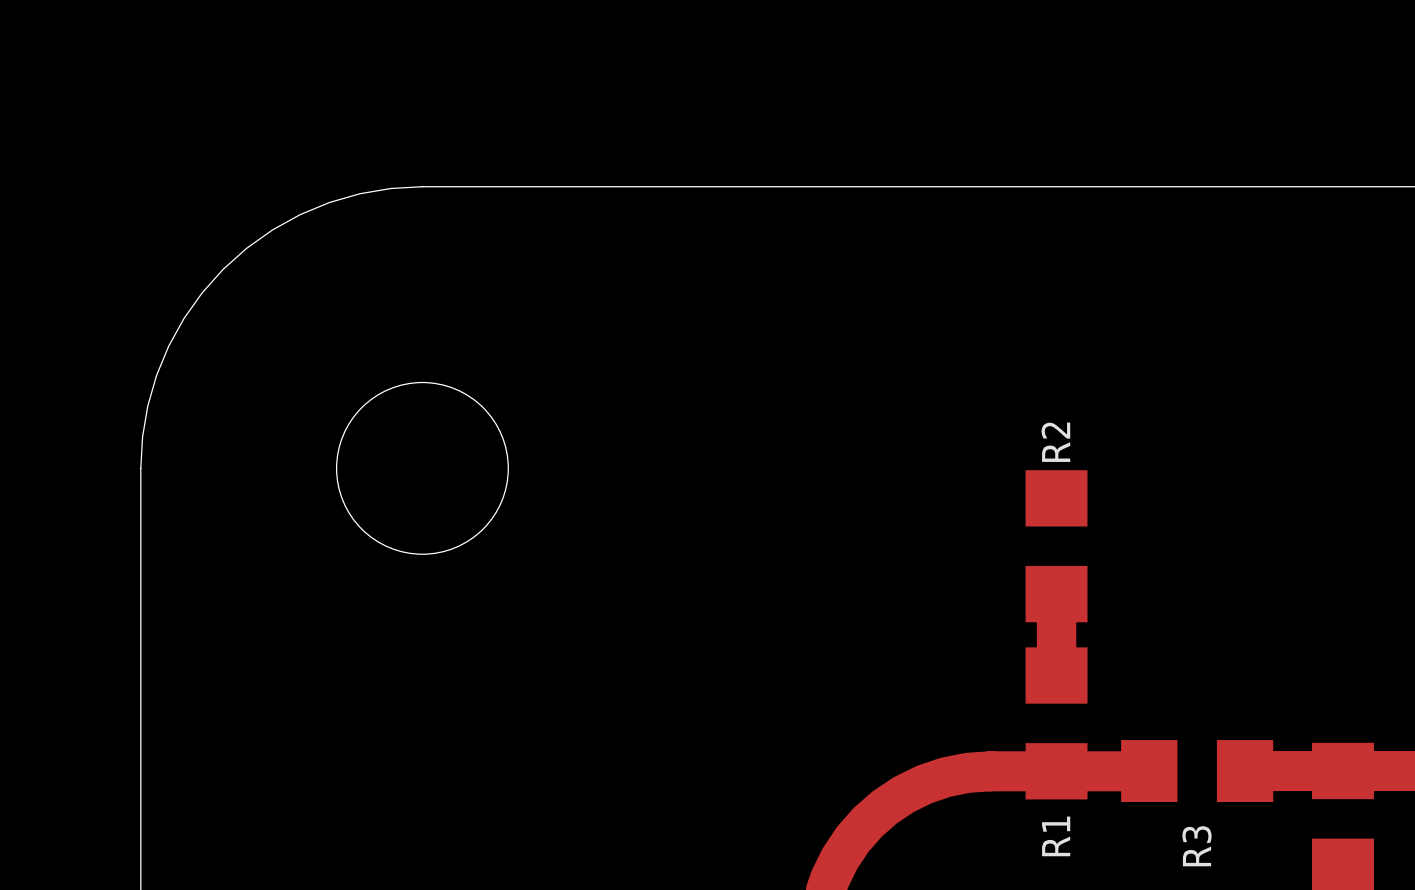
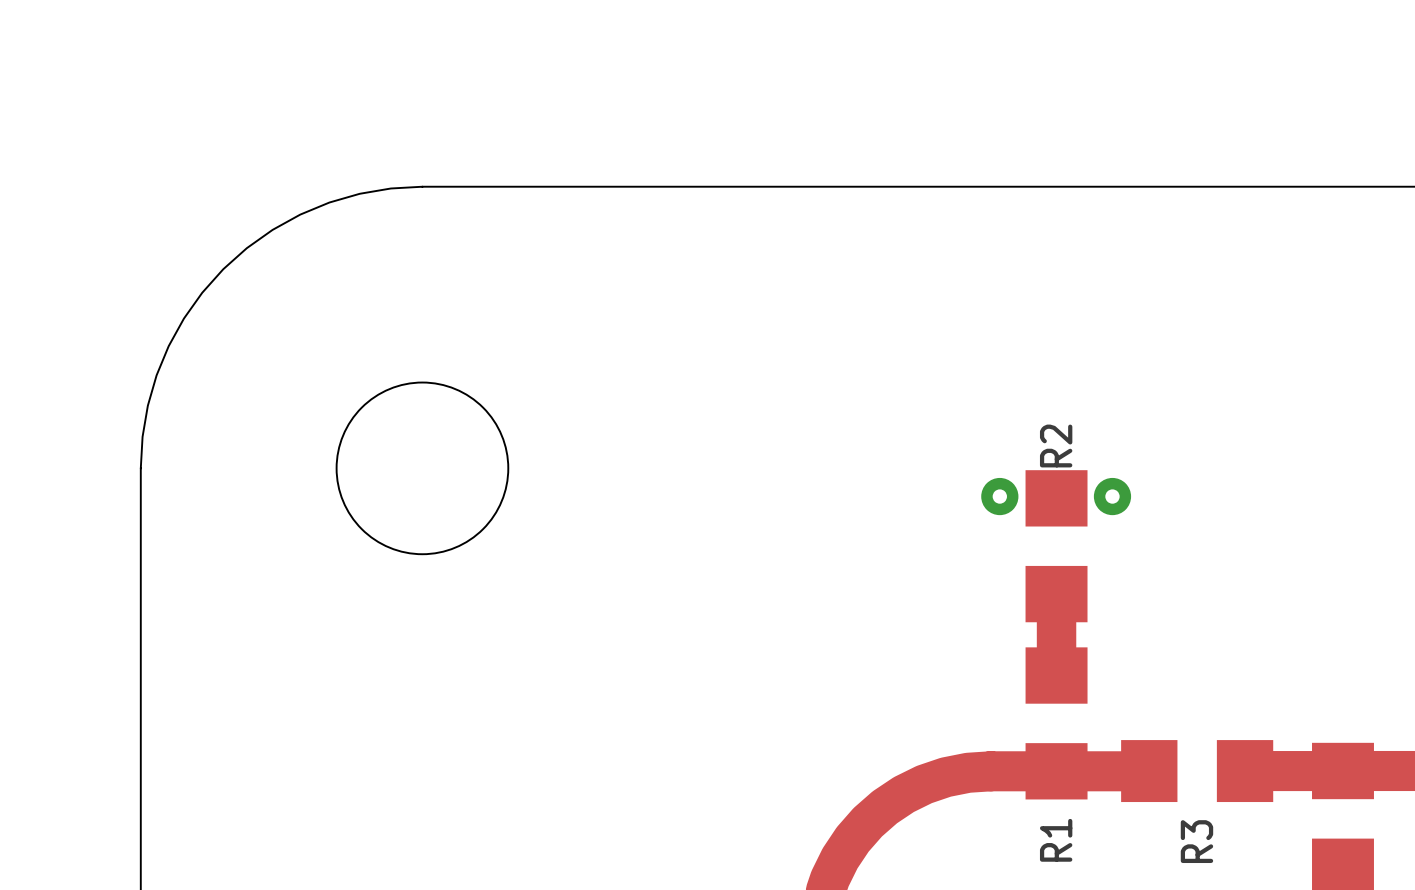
via: none -> (999, 496)
via: none -> (1112, 496)

